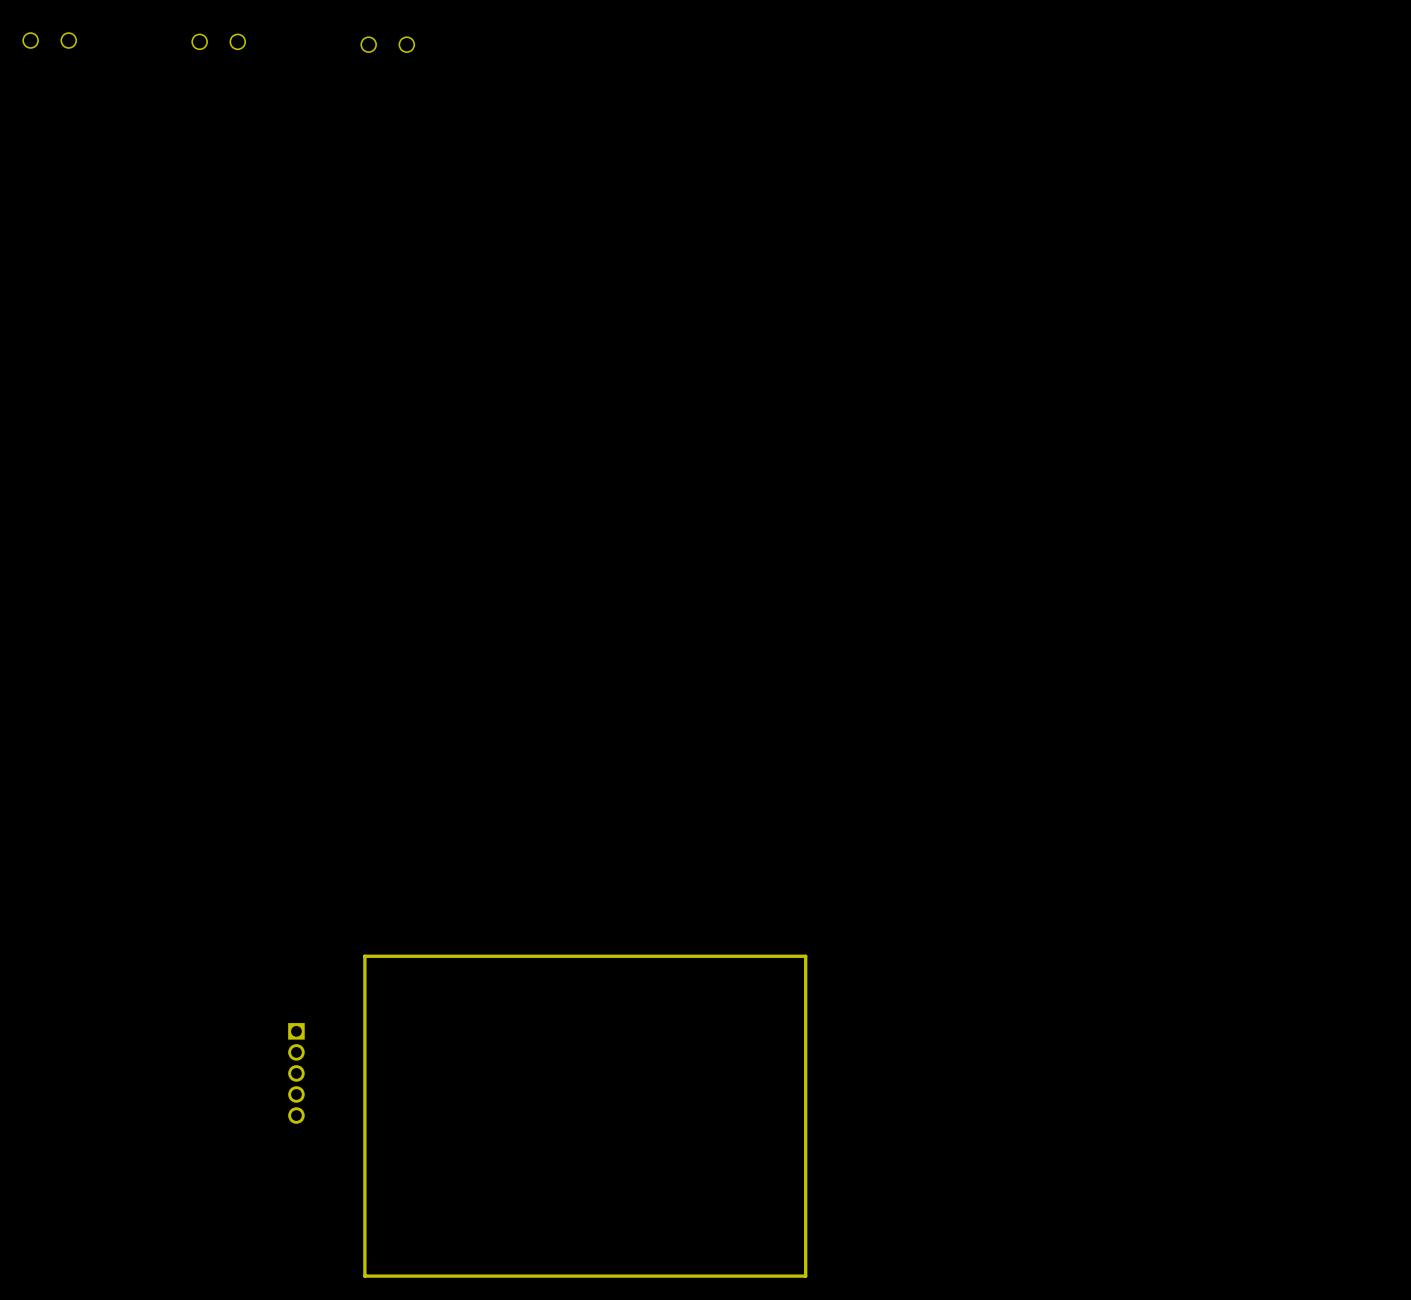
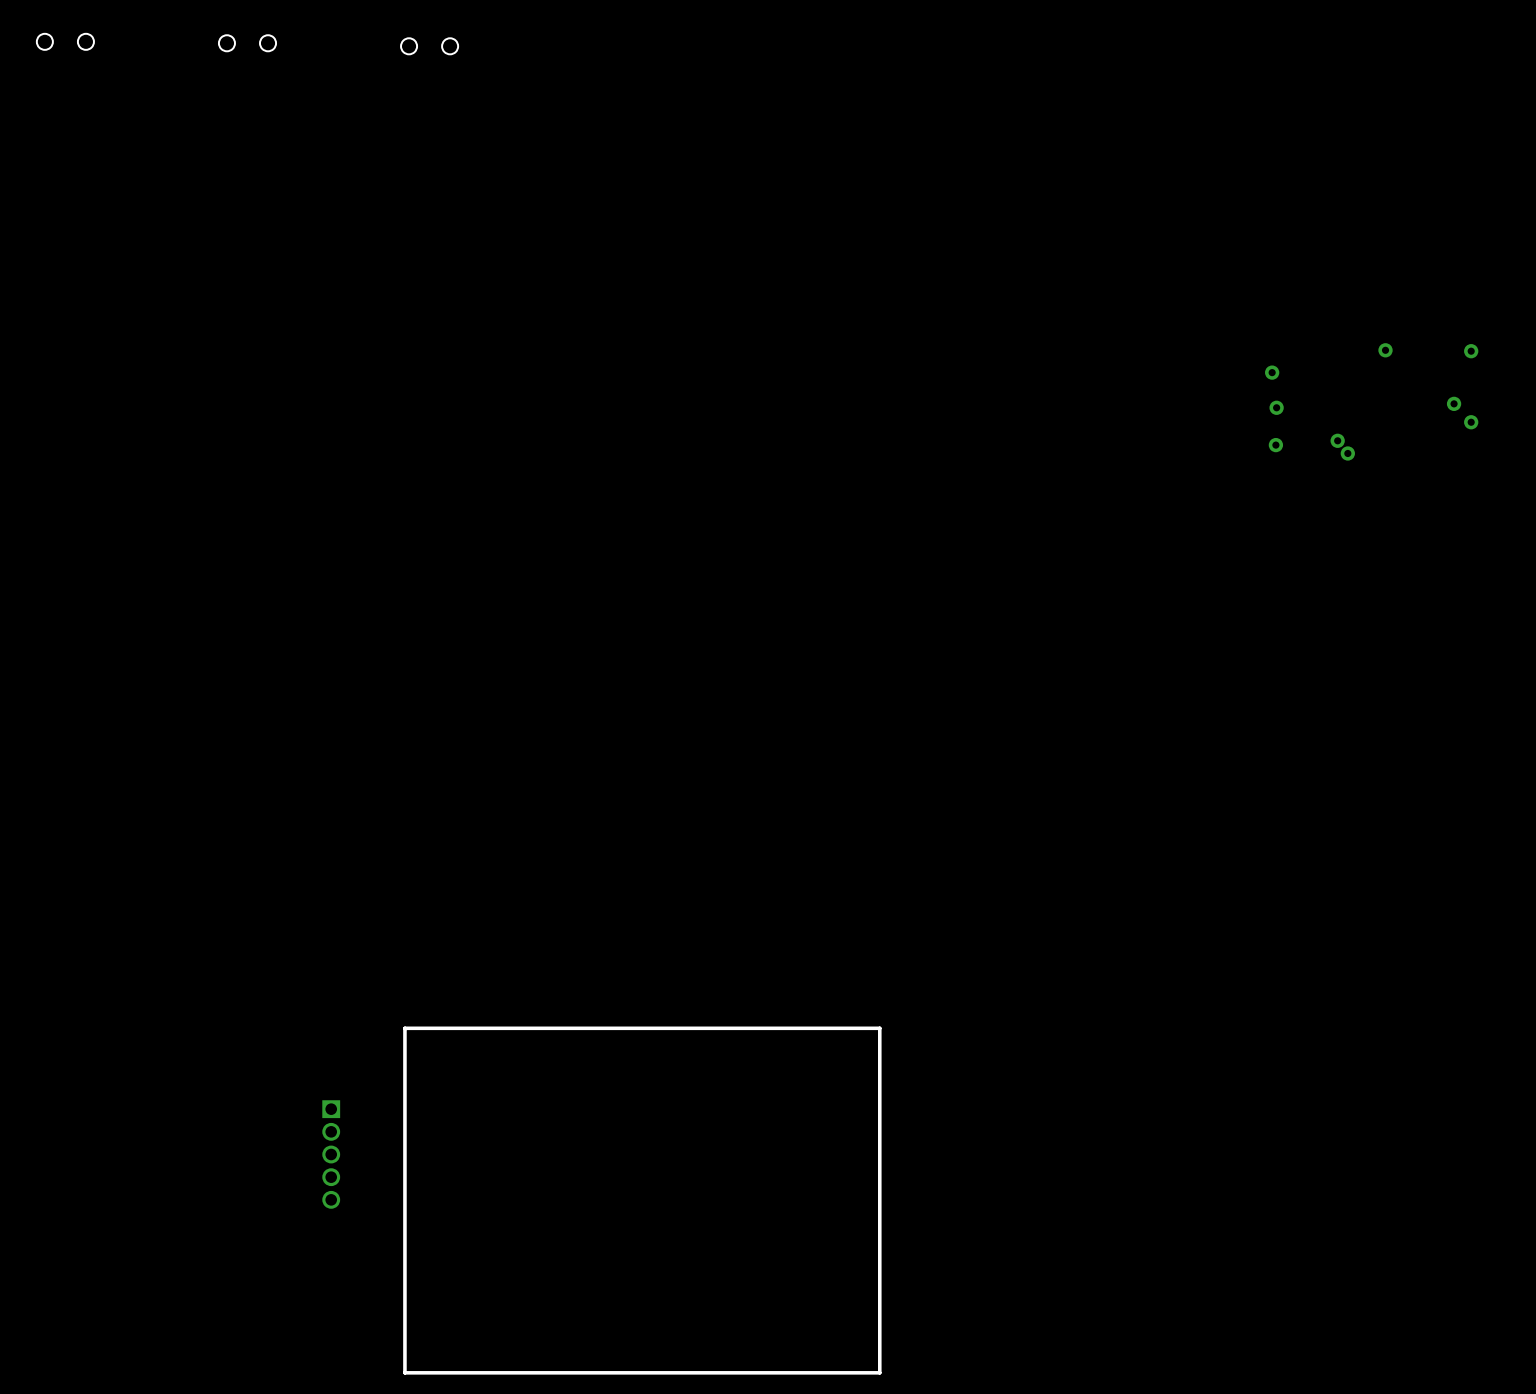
via: none -> (1385, 350)
via: none -> (1471, 351)
via: none -> (1272, 372)
via: none -> (1454, 403)
via: none -> (1276, 407)
via: none -> (1471, 422)
via: none -> (1337, 440)
via: none -> (1275, 445)
via: none -> (1347, 453)

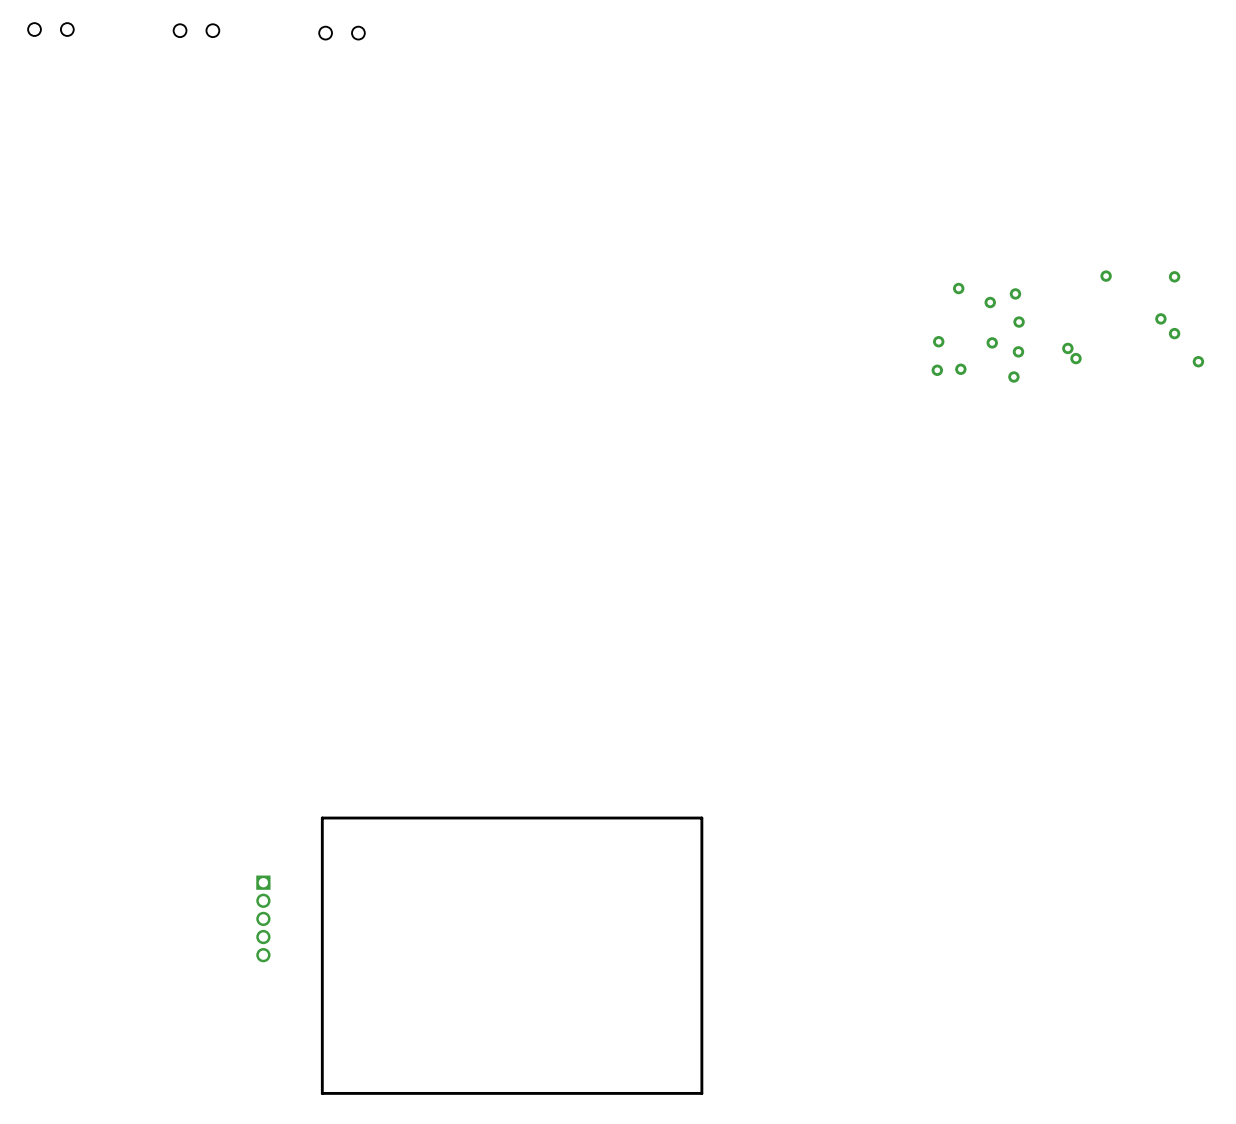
via: none -> (958, 288)
via: none -> (990, 302)
via: none -> (938, 341)
via: none -> (992, 342)
via: none -> (1198, 361)
via: none -> (960, 369)
via: none -> (937, 370)
via: none -> (1013, 376)

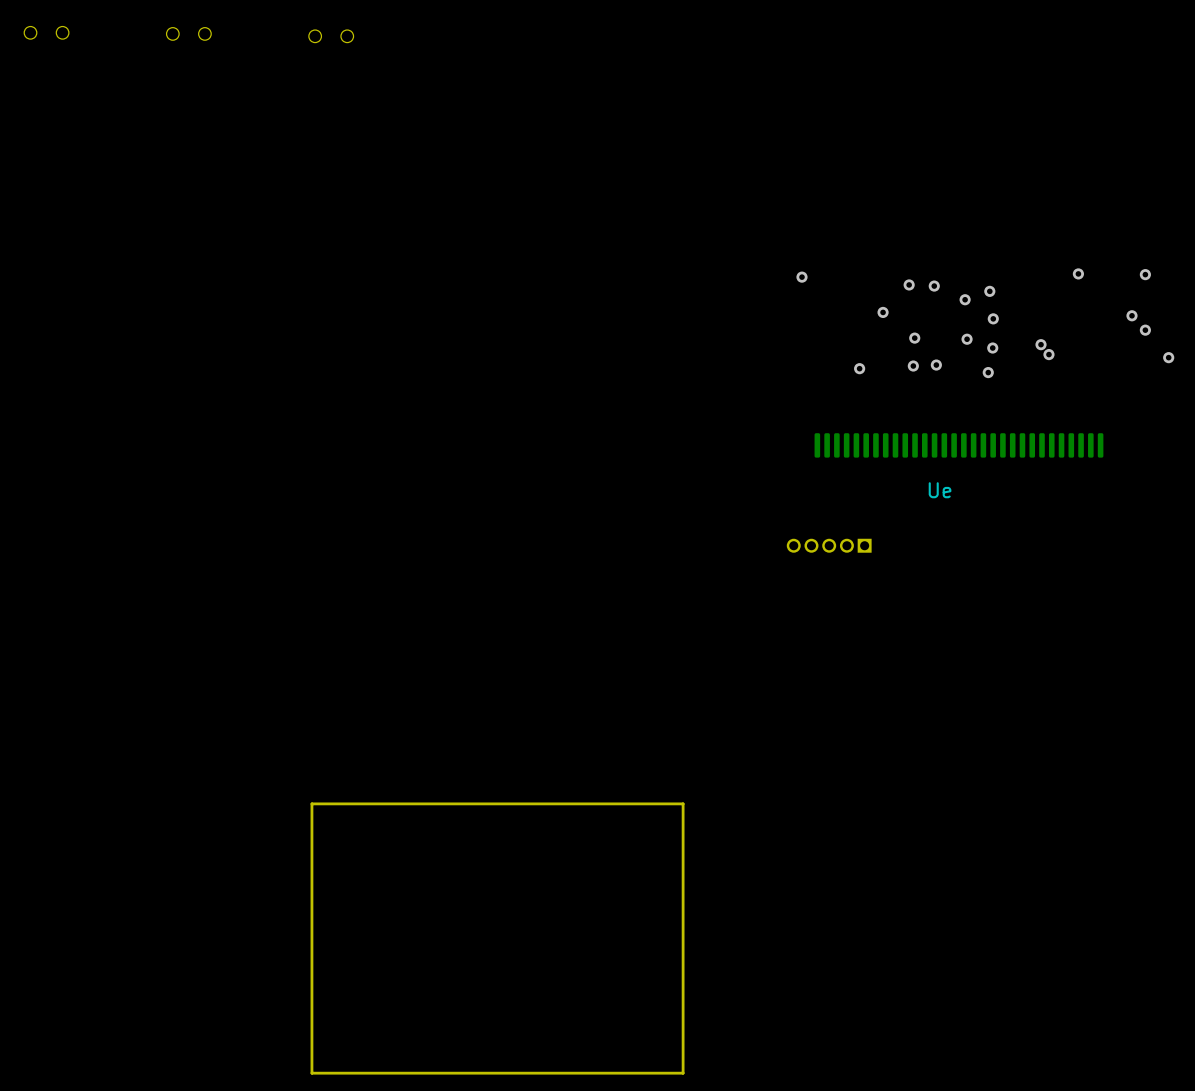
via: none -> (801, 277)
via: none -> (909, 284)
via: none -> (883, 312)
via: none -> (859, 368)
Ue: none -> (958, 445)
part: none -> (829, 545)
part: (263, 918) -> none

